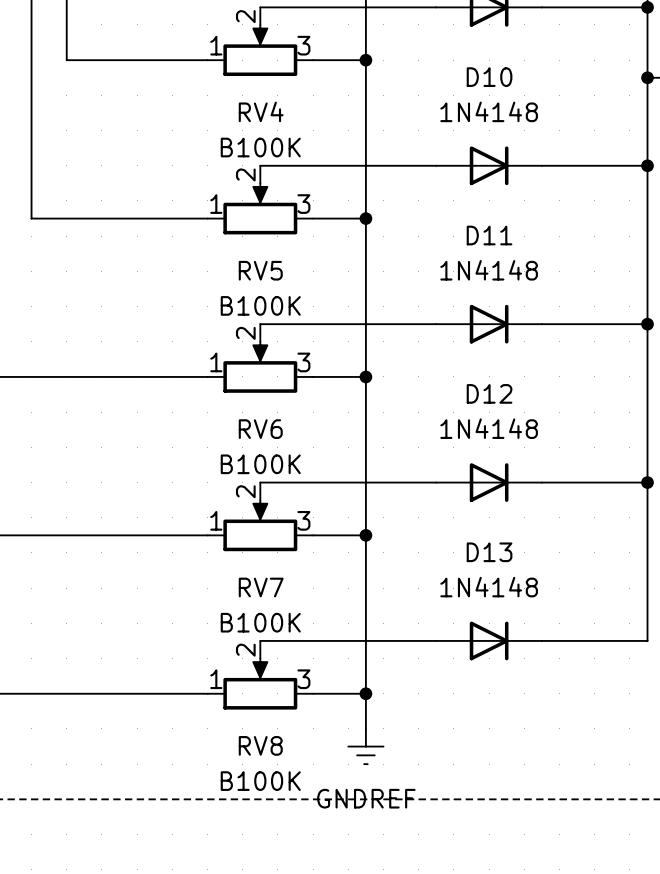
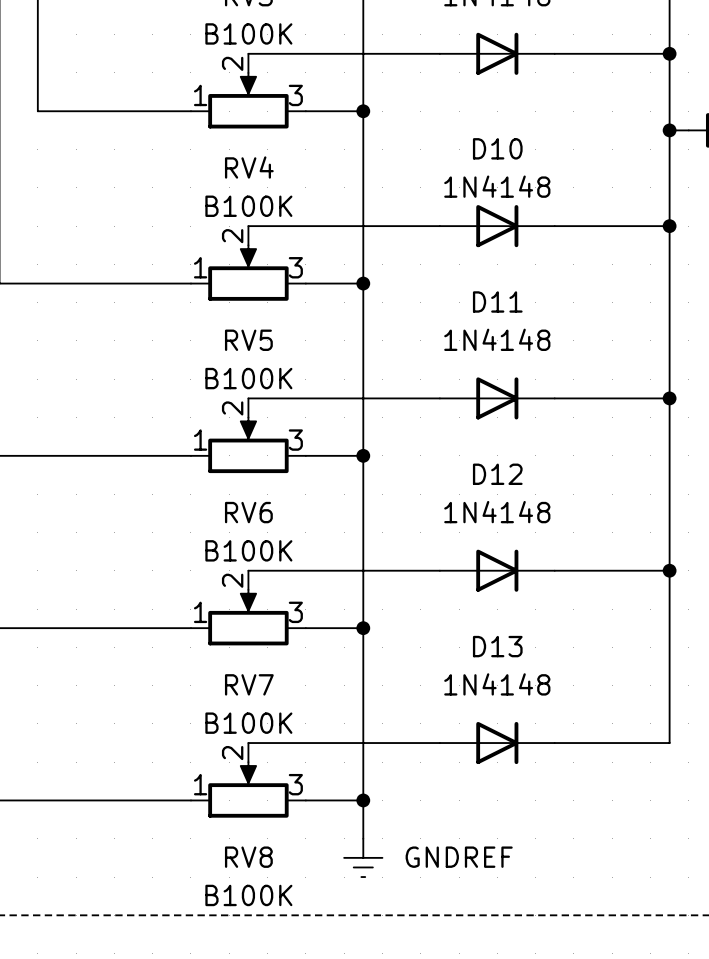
D10 name position: D10 (489, 77) -> D10 (497, 148)
D10 value position: 1N4148 (489, 111) -> 1N4148 (497, 186)
power symbol text position: GNDREF (366, 798) -> GNDREF (459, 857)

